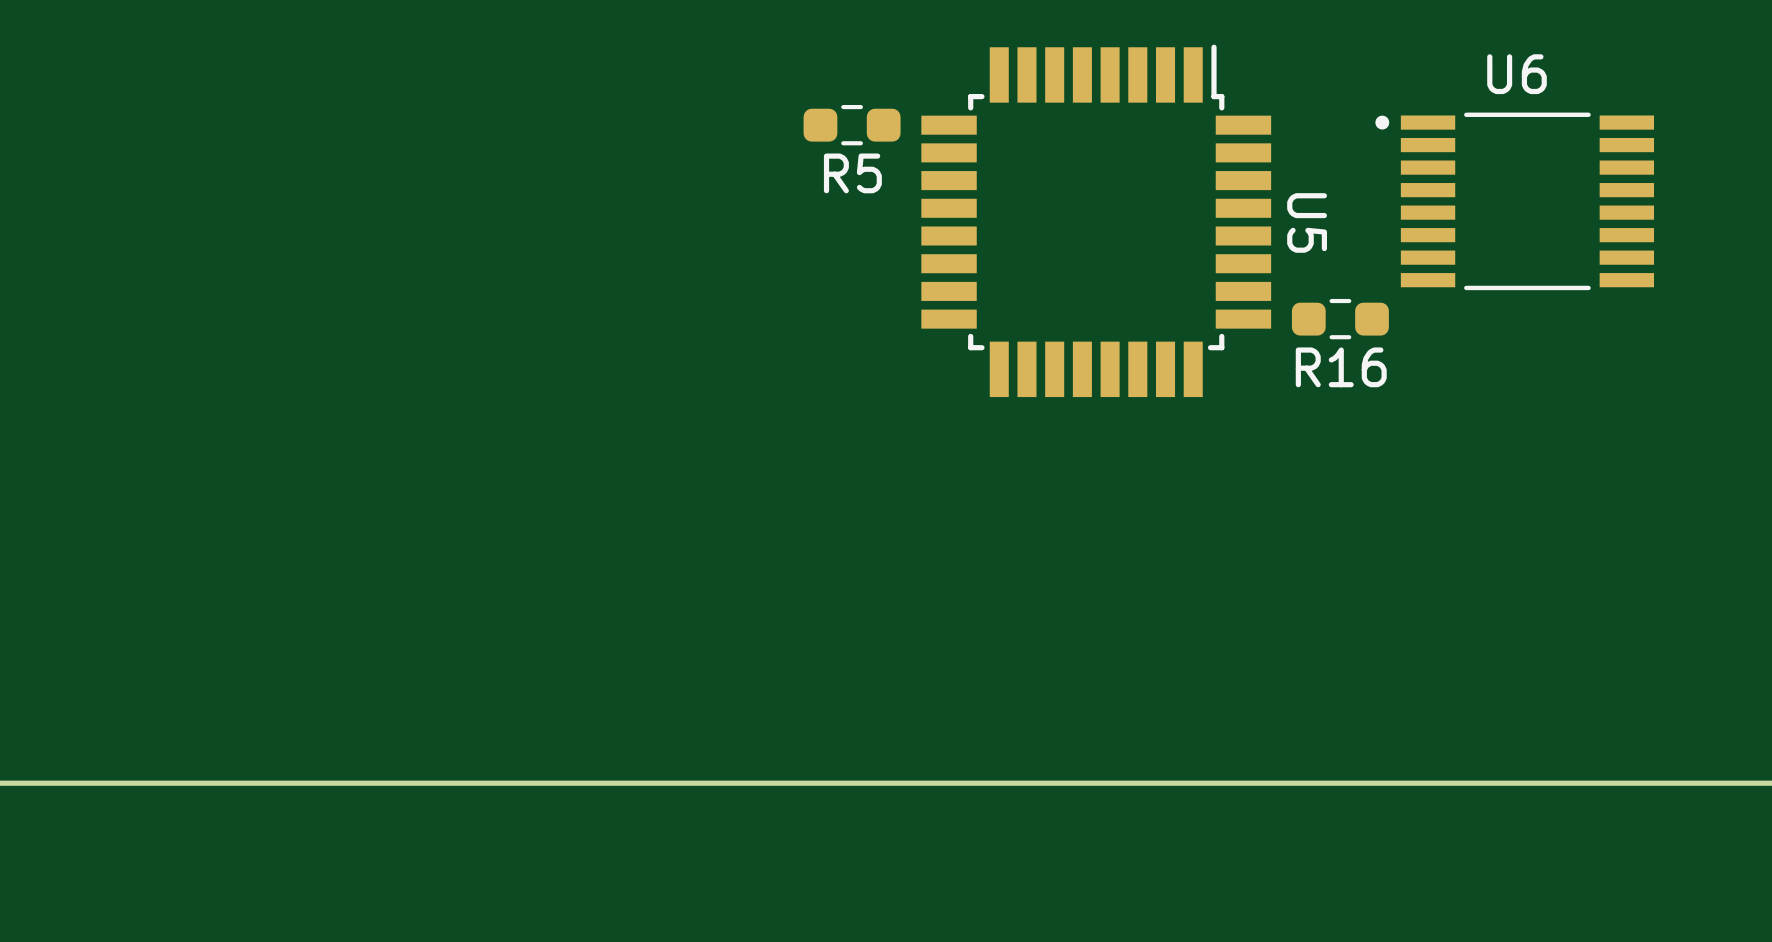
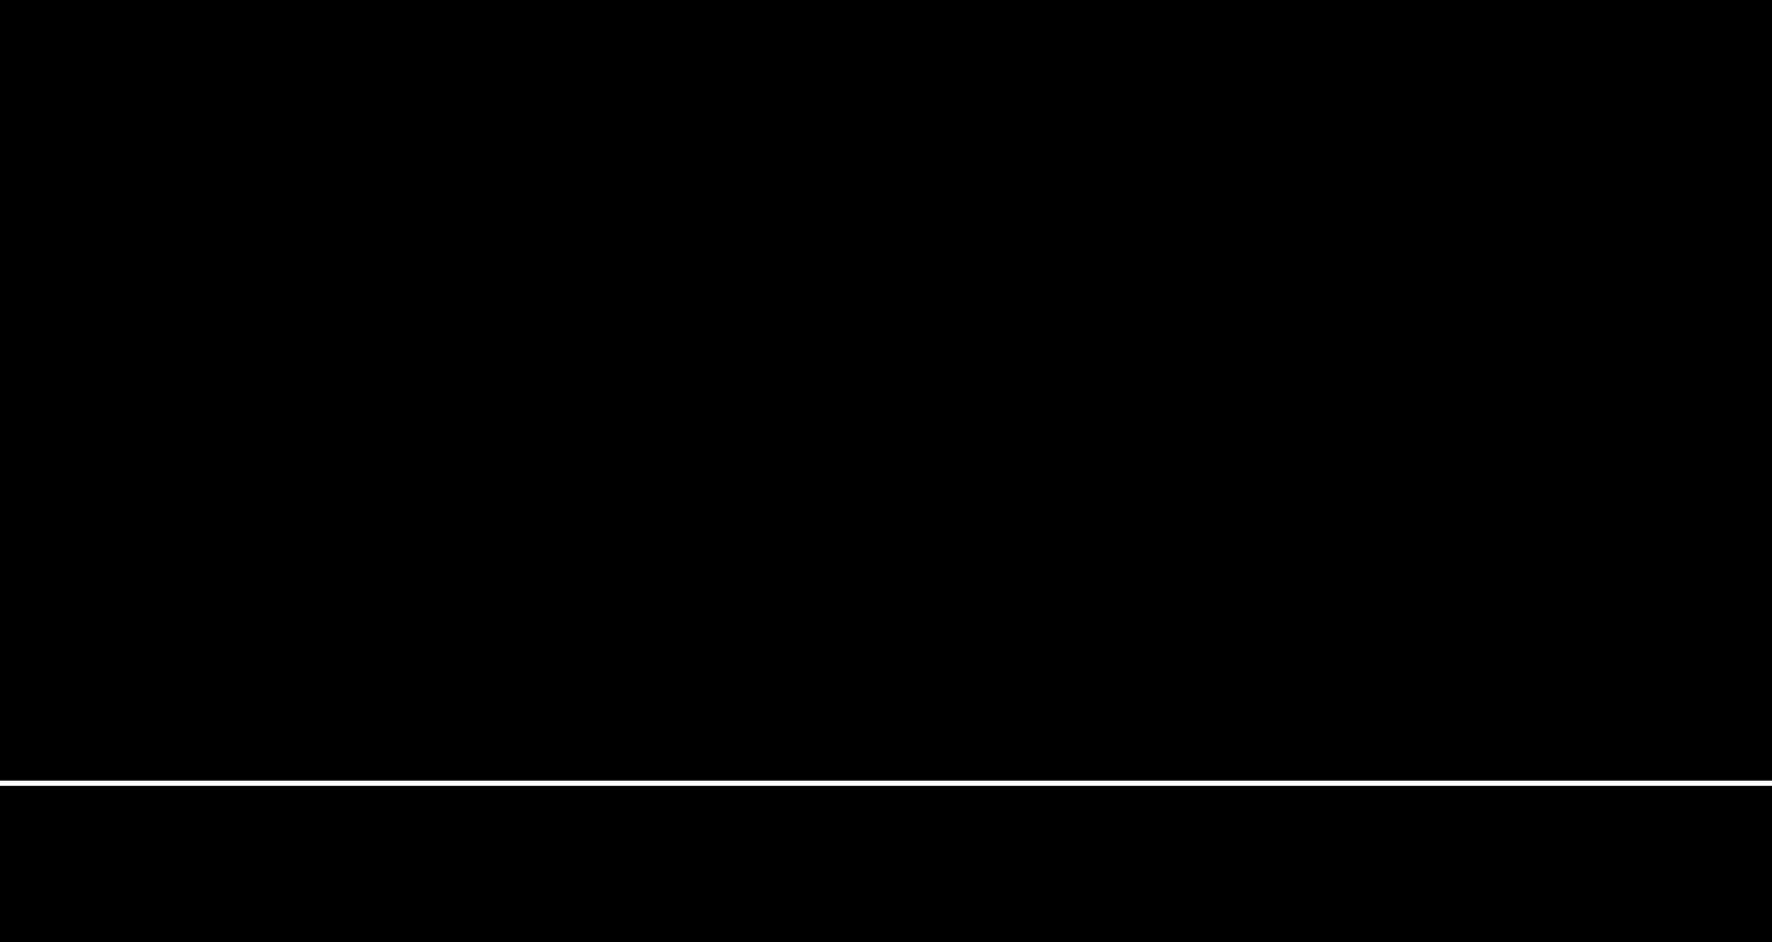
R5: (852, 125) -> none
U6: (1514, 201) -> none
U5: (1096, 220) -> none
R16: (1340, 319) -> none

